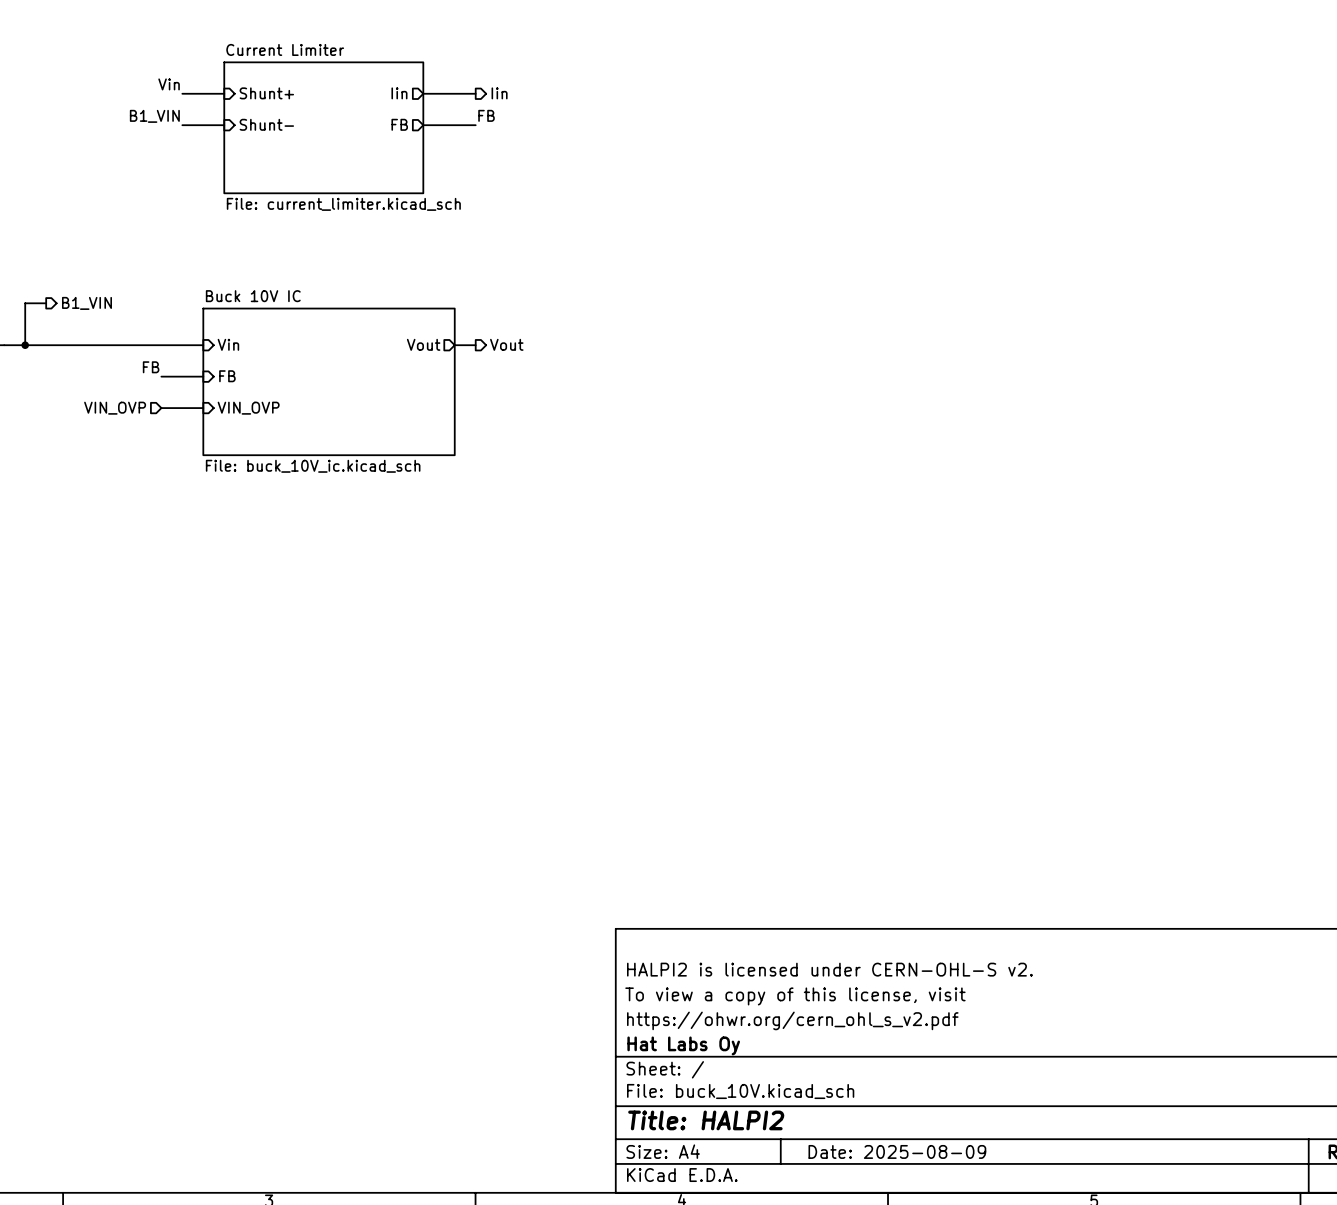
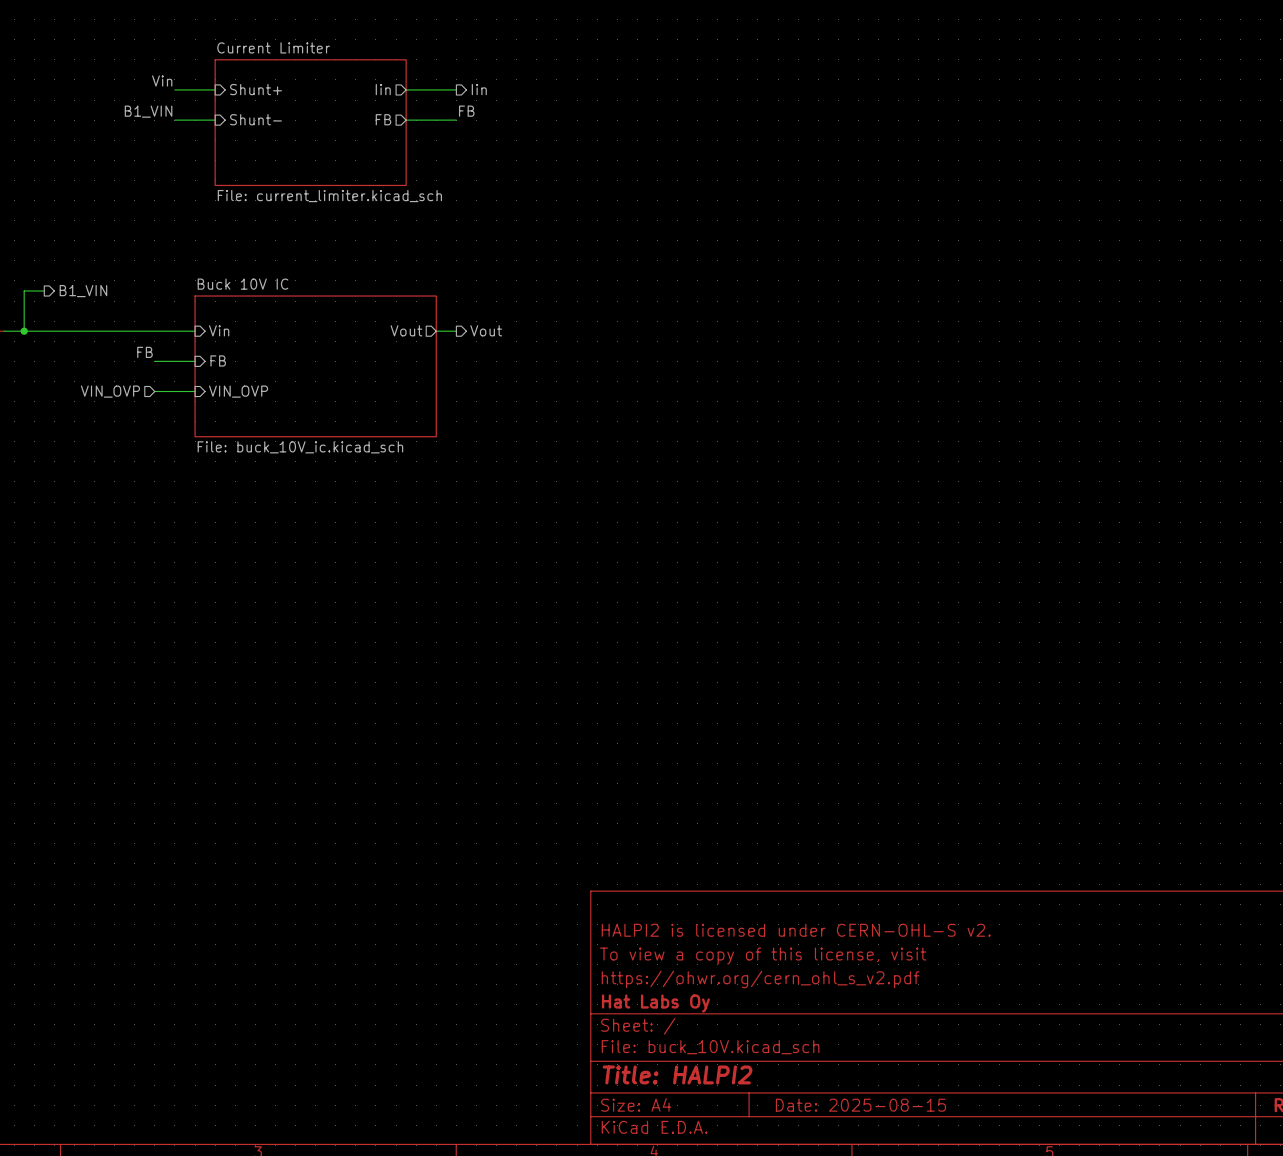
title block: Date: 2025-08-09 (897, 1151) -> Date: 2025-08-15 (860, 1105)

